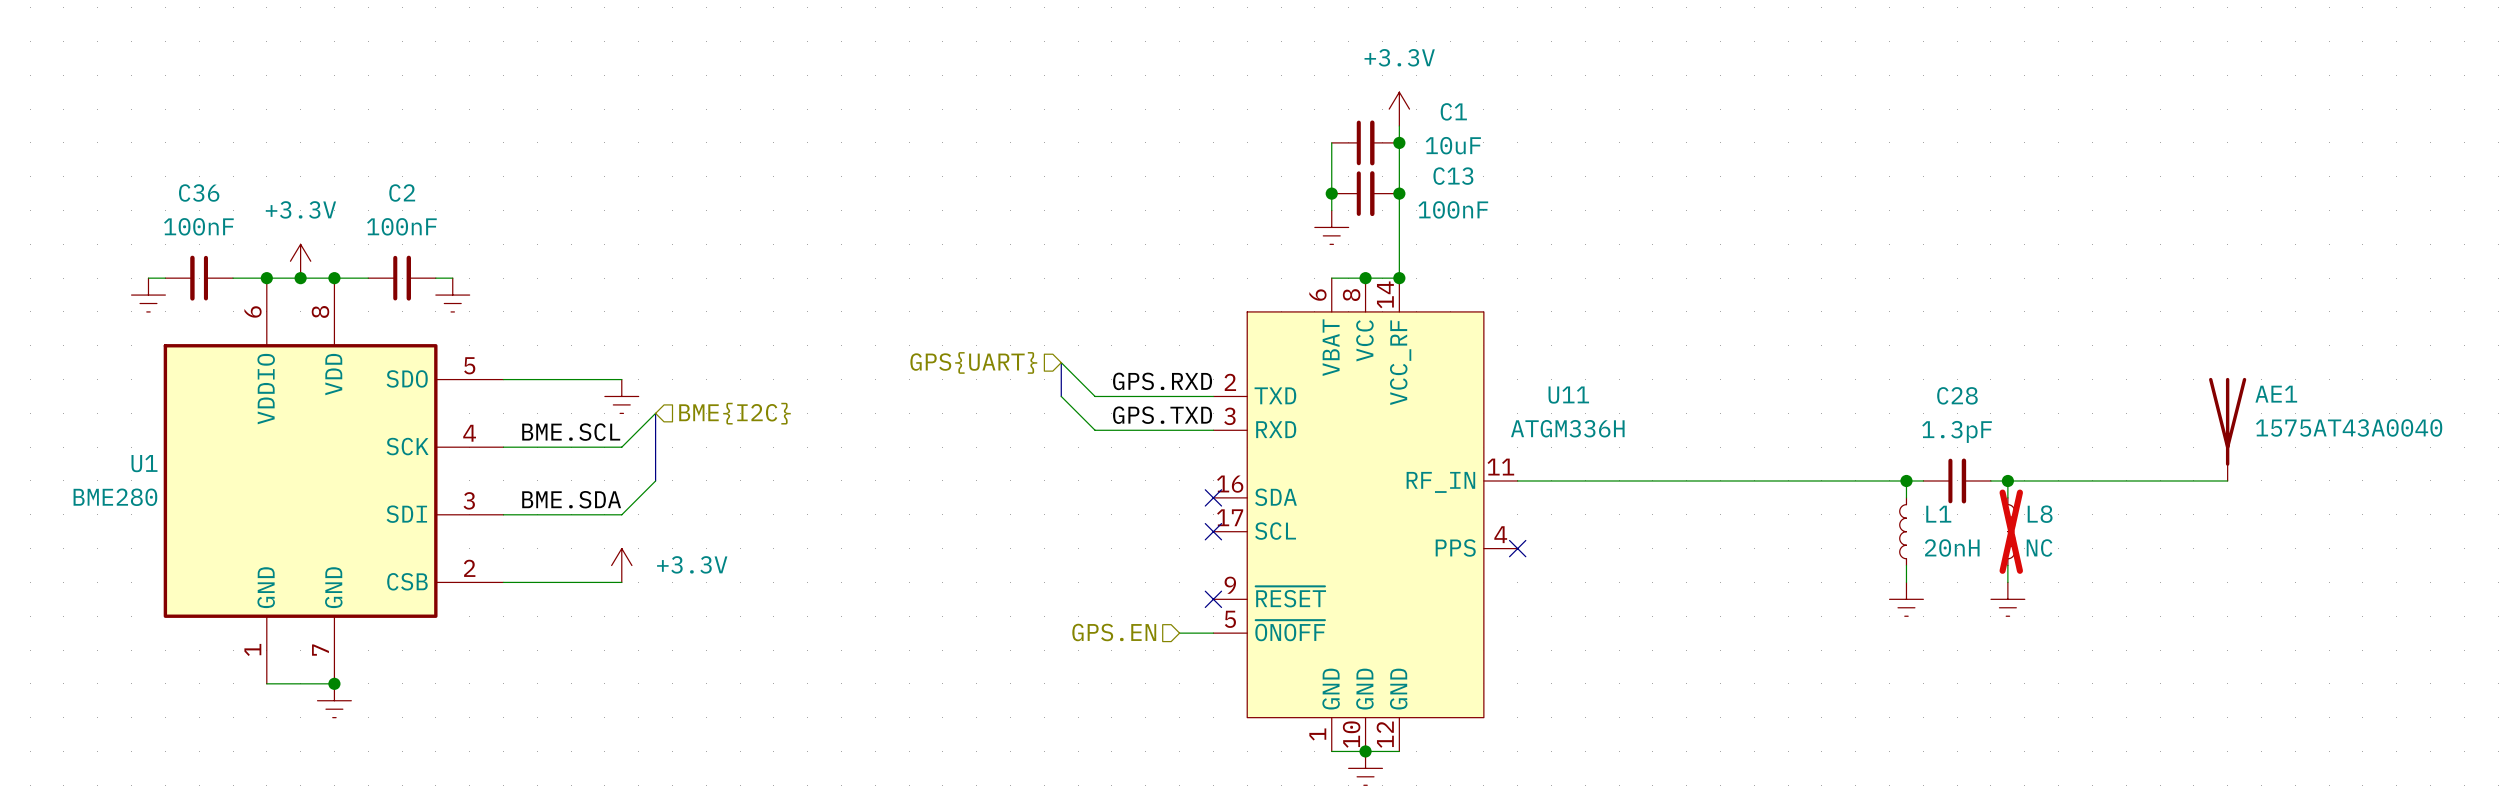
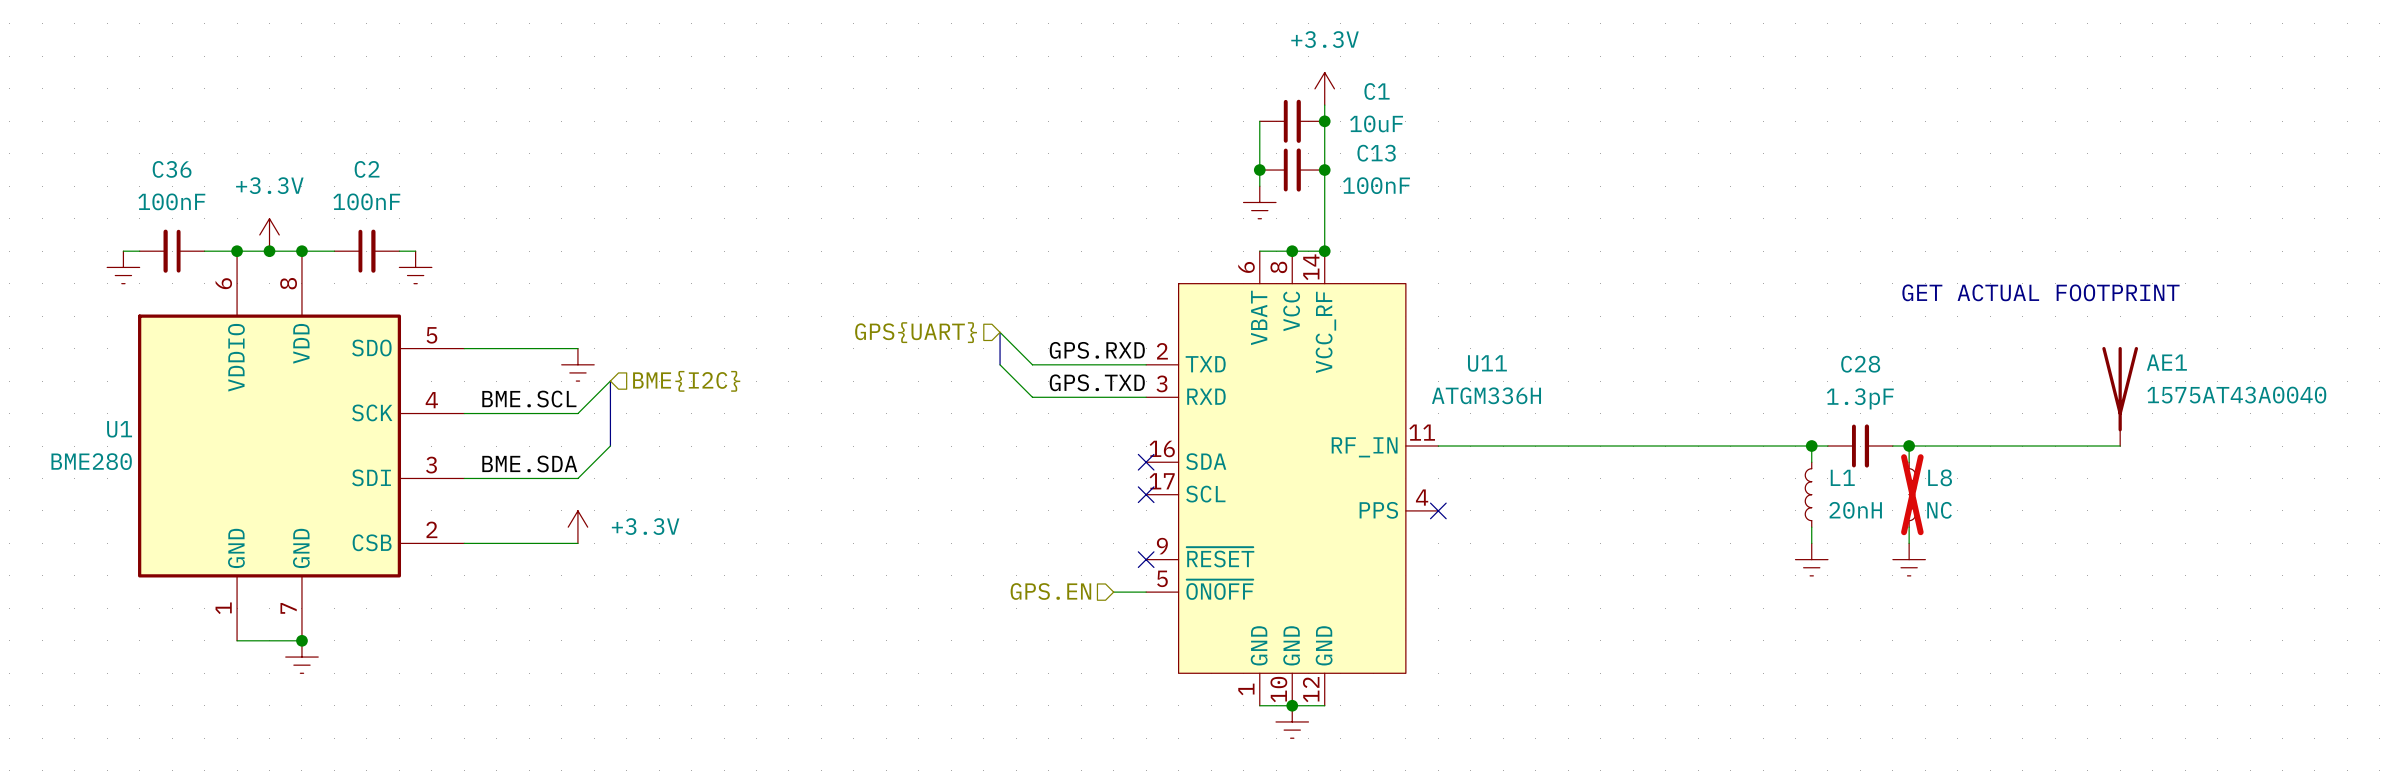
text: none -> GET ACTUAL FOOTPRINT (2040, 292)

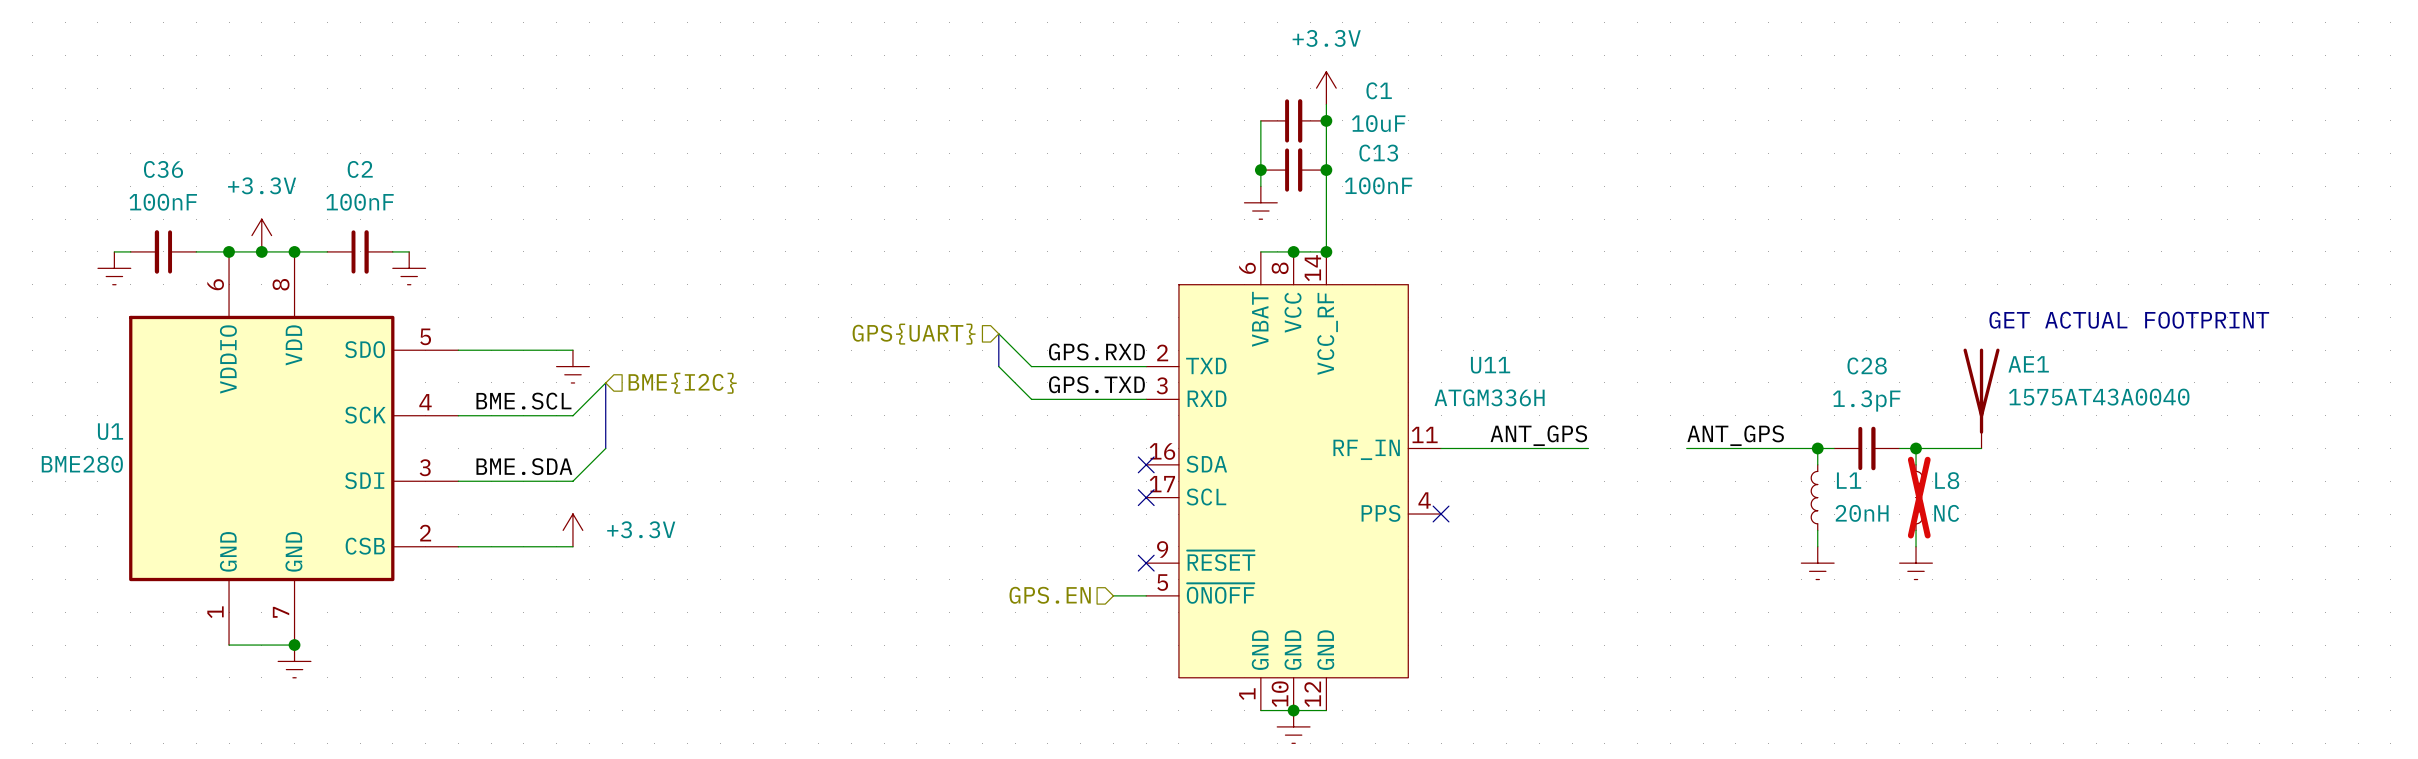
text position: GET ACTUAL FOOTPRINT (2040, 292) -> GET ACTUAL FOOTPRINT (2129, 320)
AE1 position: (2120, 396) -> (1981, 398)
label: none -> ANT_GPS (1538, 435)
label: none -> ANT_GPS (1735, 435)
wire: (1584, 446) (1681, 446) -> none
wire: (1974, 446) (2120, 446) -> none

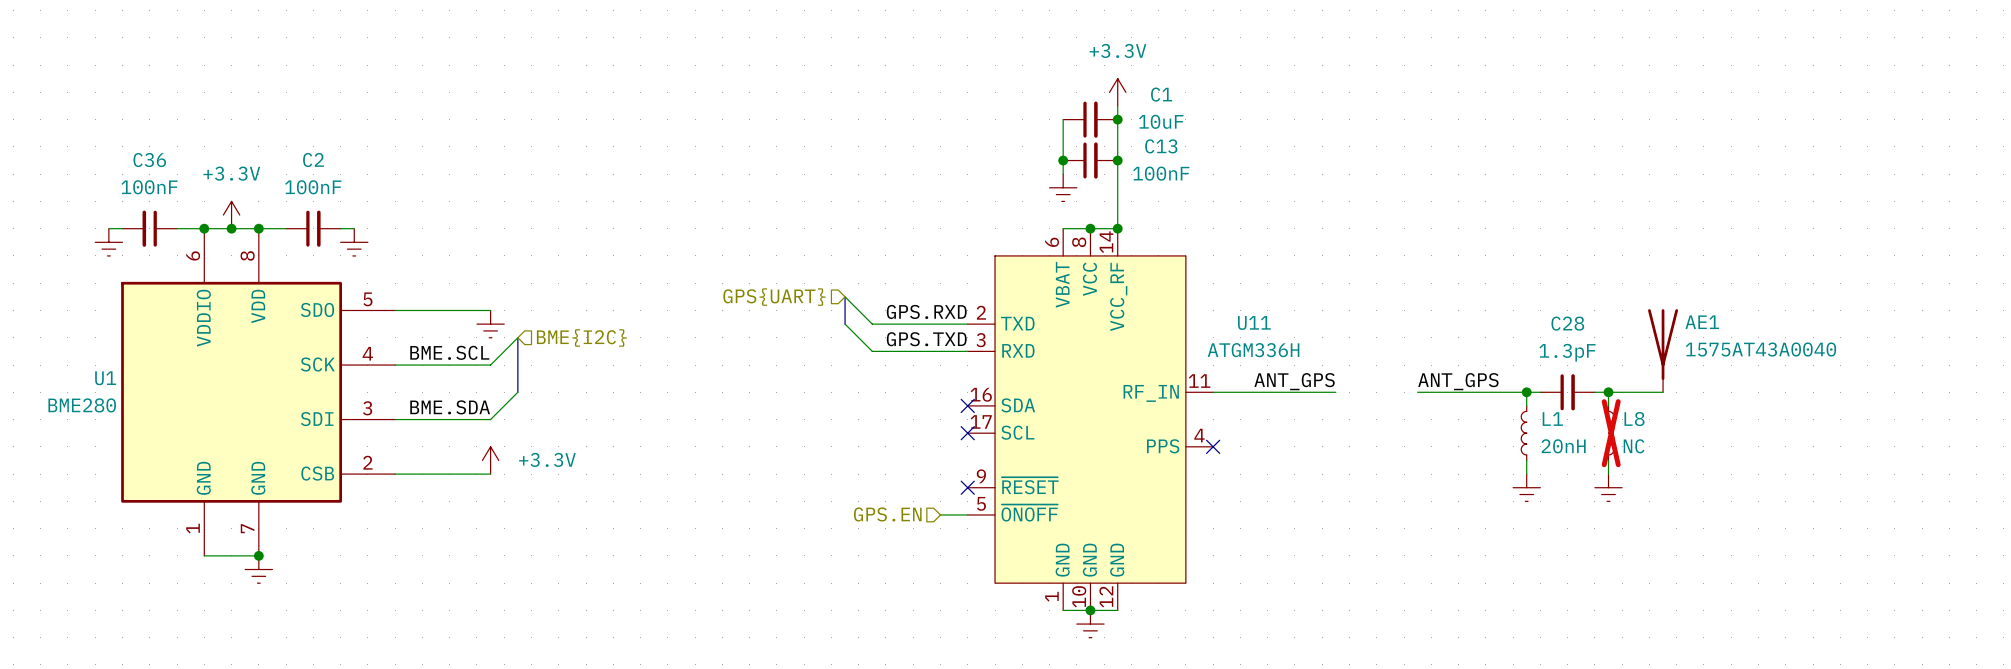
text: GET ACTUAL FOOTPRINT (2129, 320) -> none

